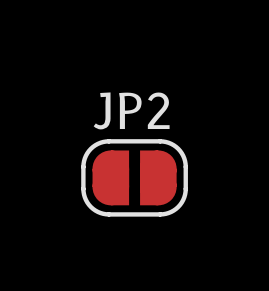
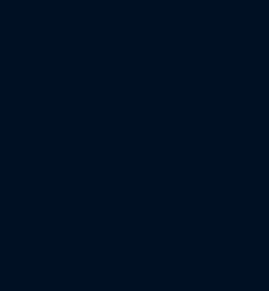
JP2: (134, 177) -> none

